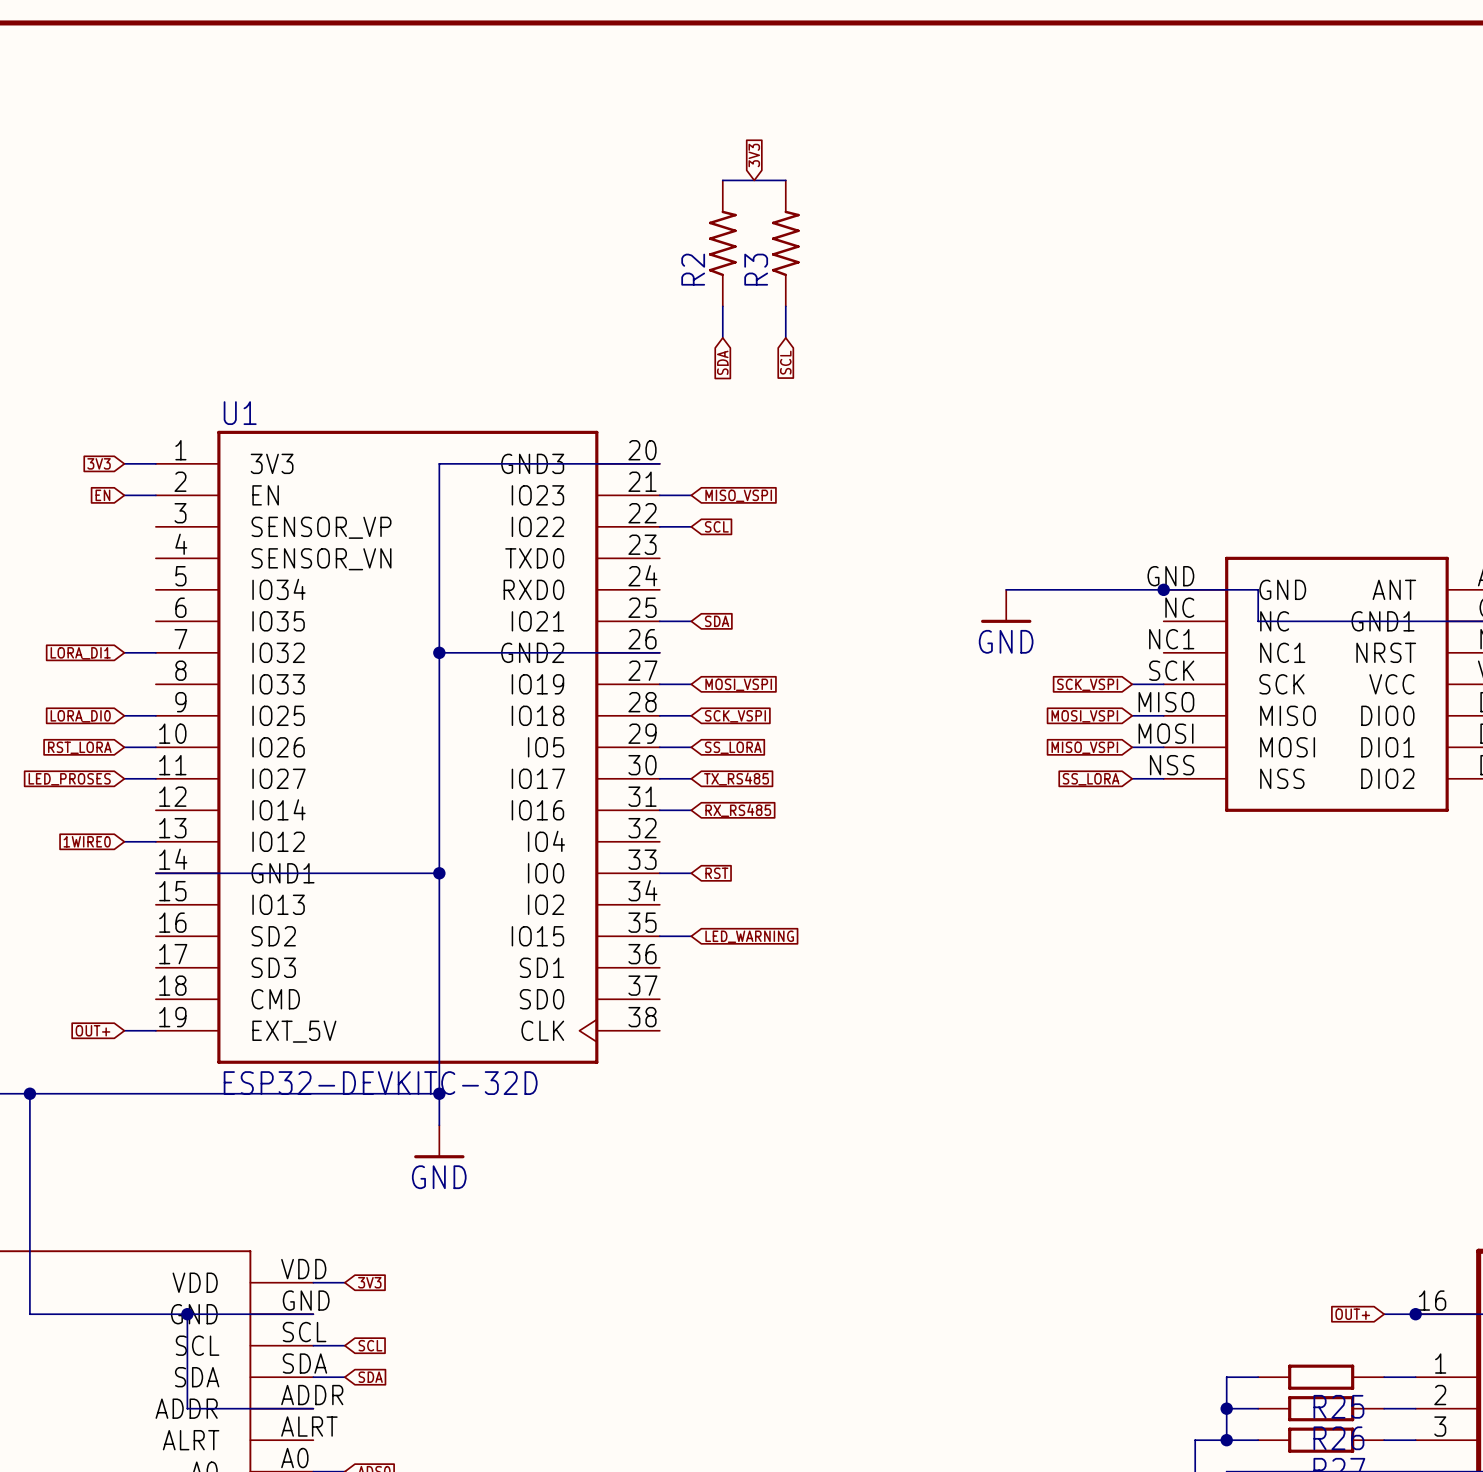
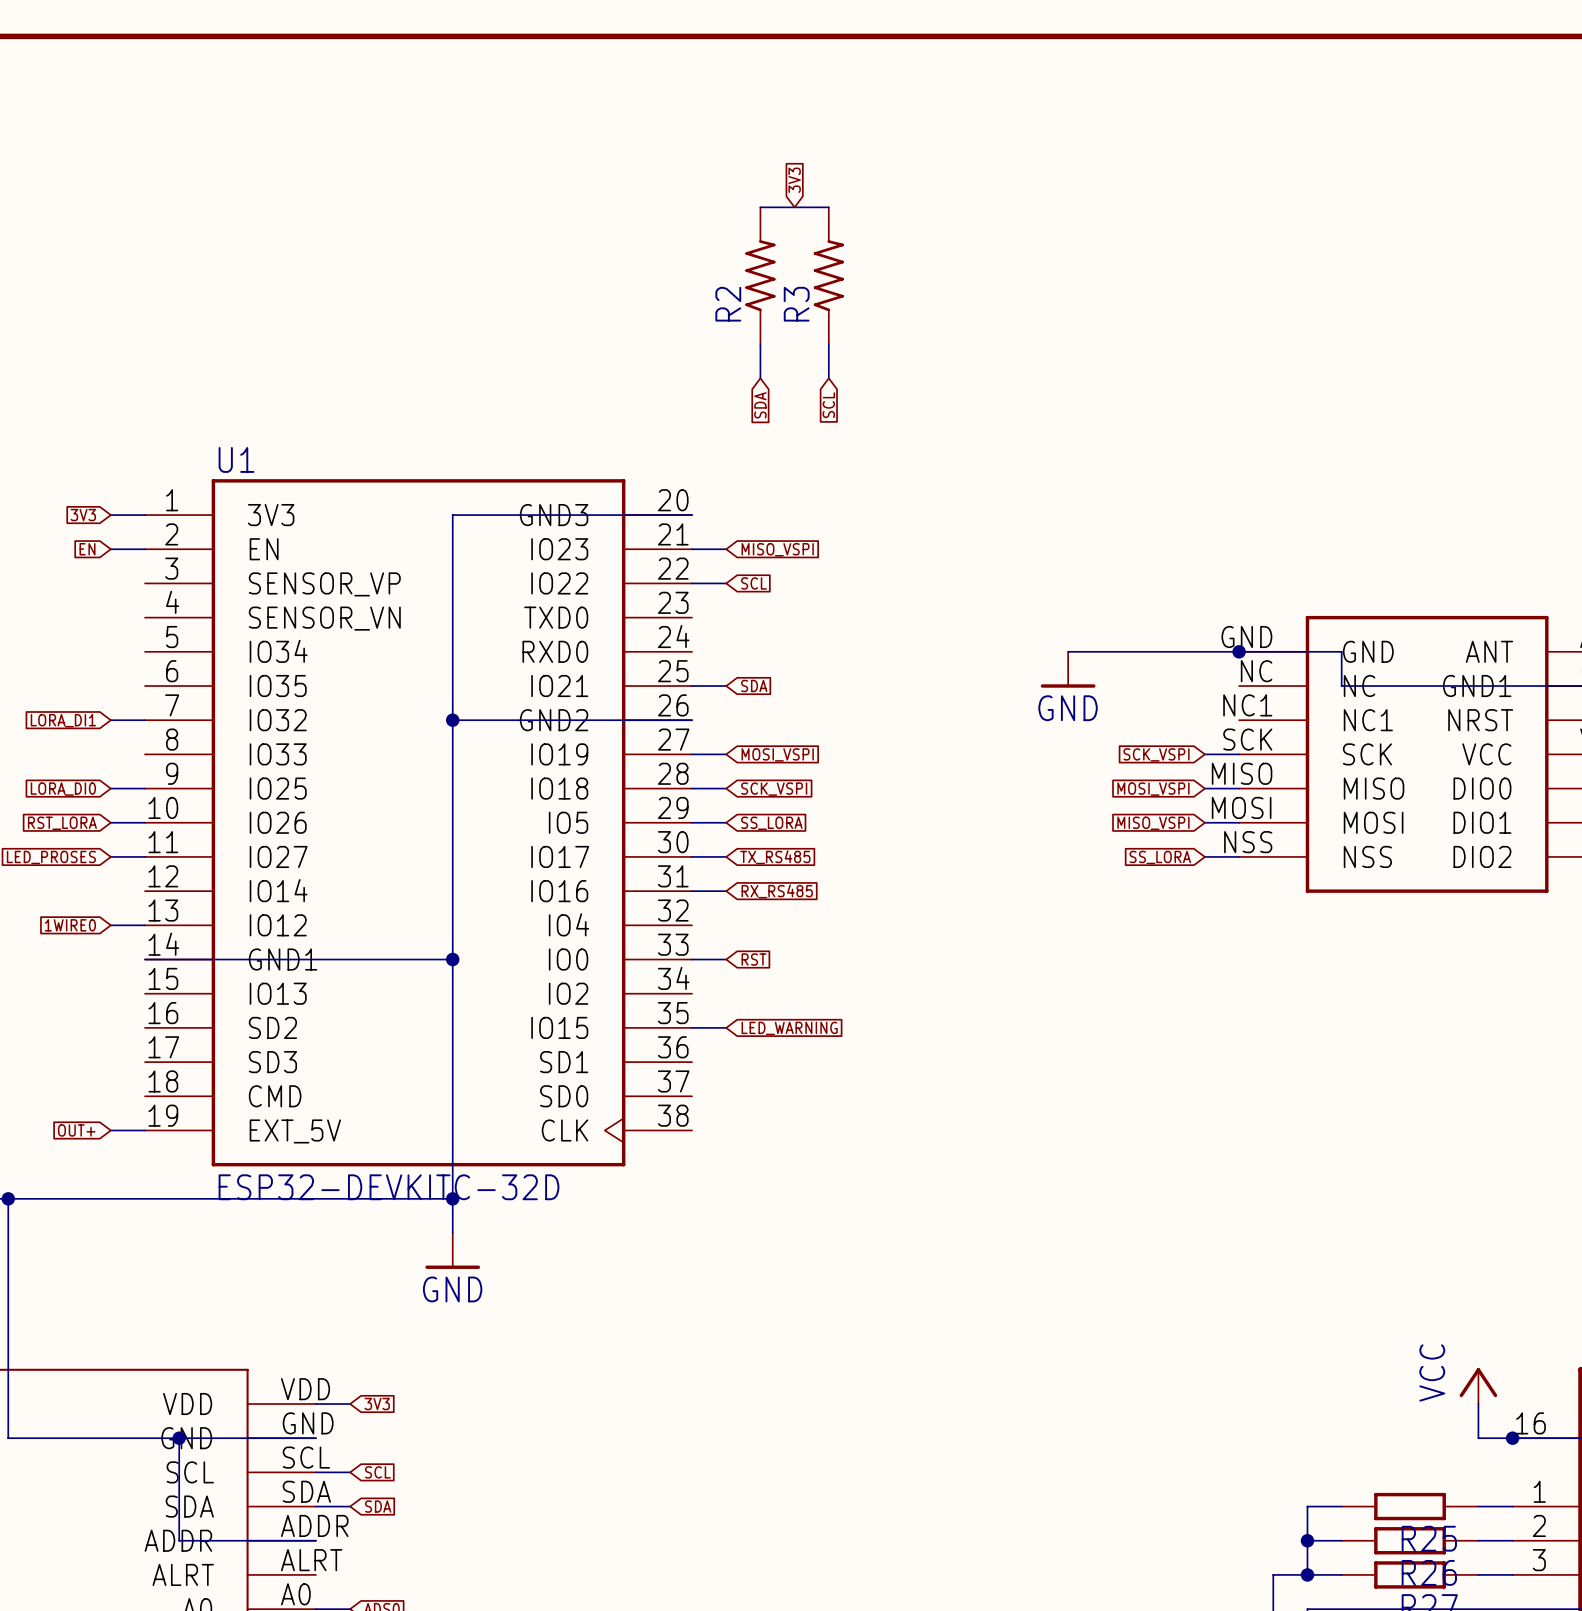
power symbol: none -> VCC (1478, 1386)
wire: none -> (1478, 1403) (1478, 1438)
global label: OUT+ (1352, 1314) -> none

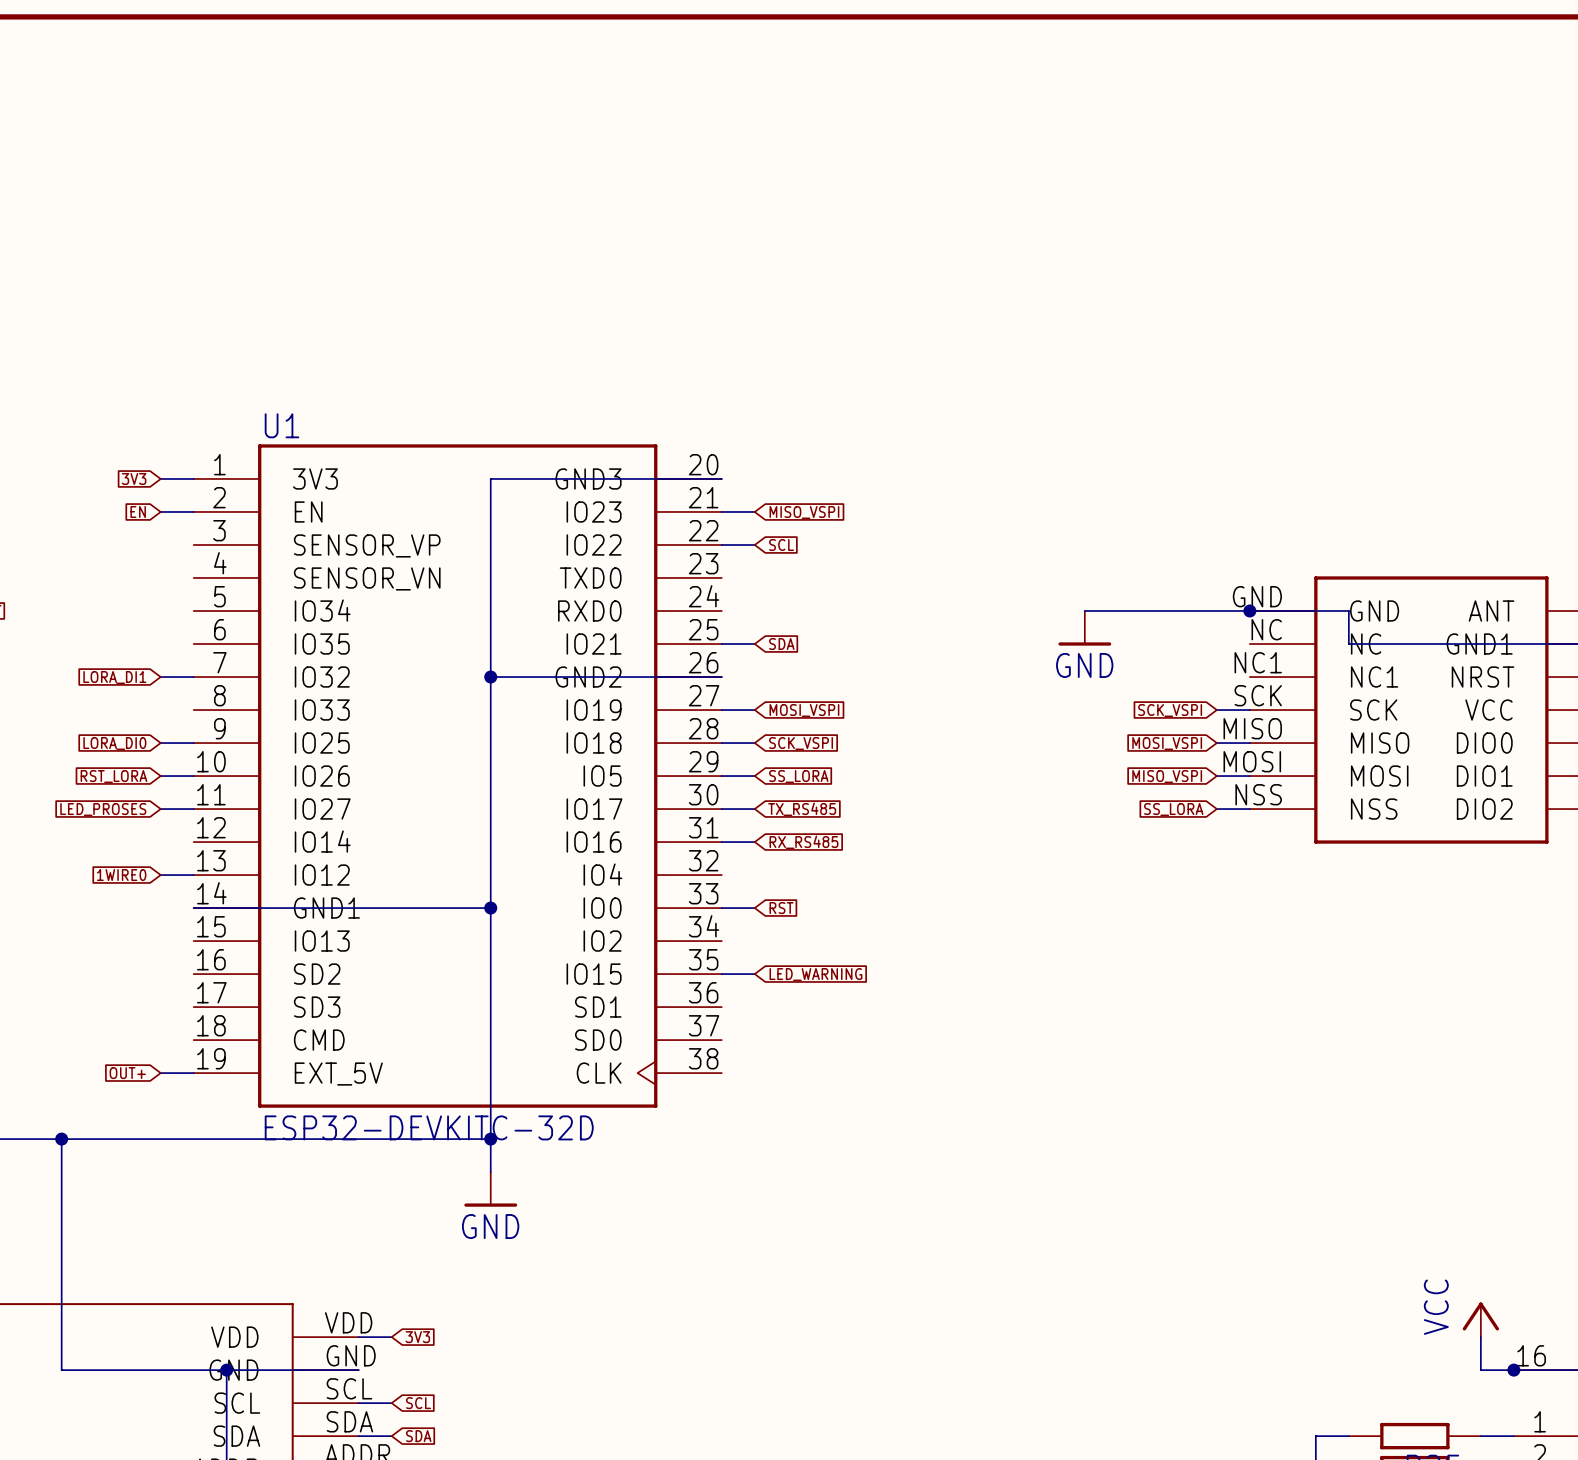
global label: 3V3 (794, 180) -> none
wire: (760, 207) (828, 207) -> none
R2: (760, 275) -> none
R3: (828, 275) -> none
wire: (760, 344) (760, 378) -> none
wire: (828, 344) (828, 378) -> none
global label: SDA (760, 405) -> none
global label: SCL (828, 405) -> none

